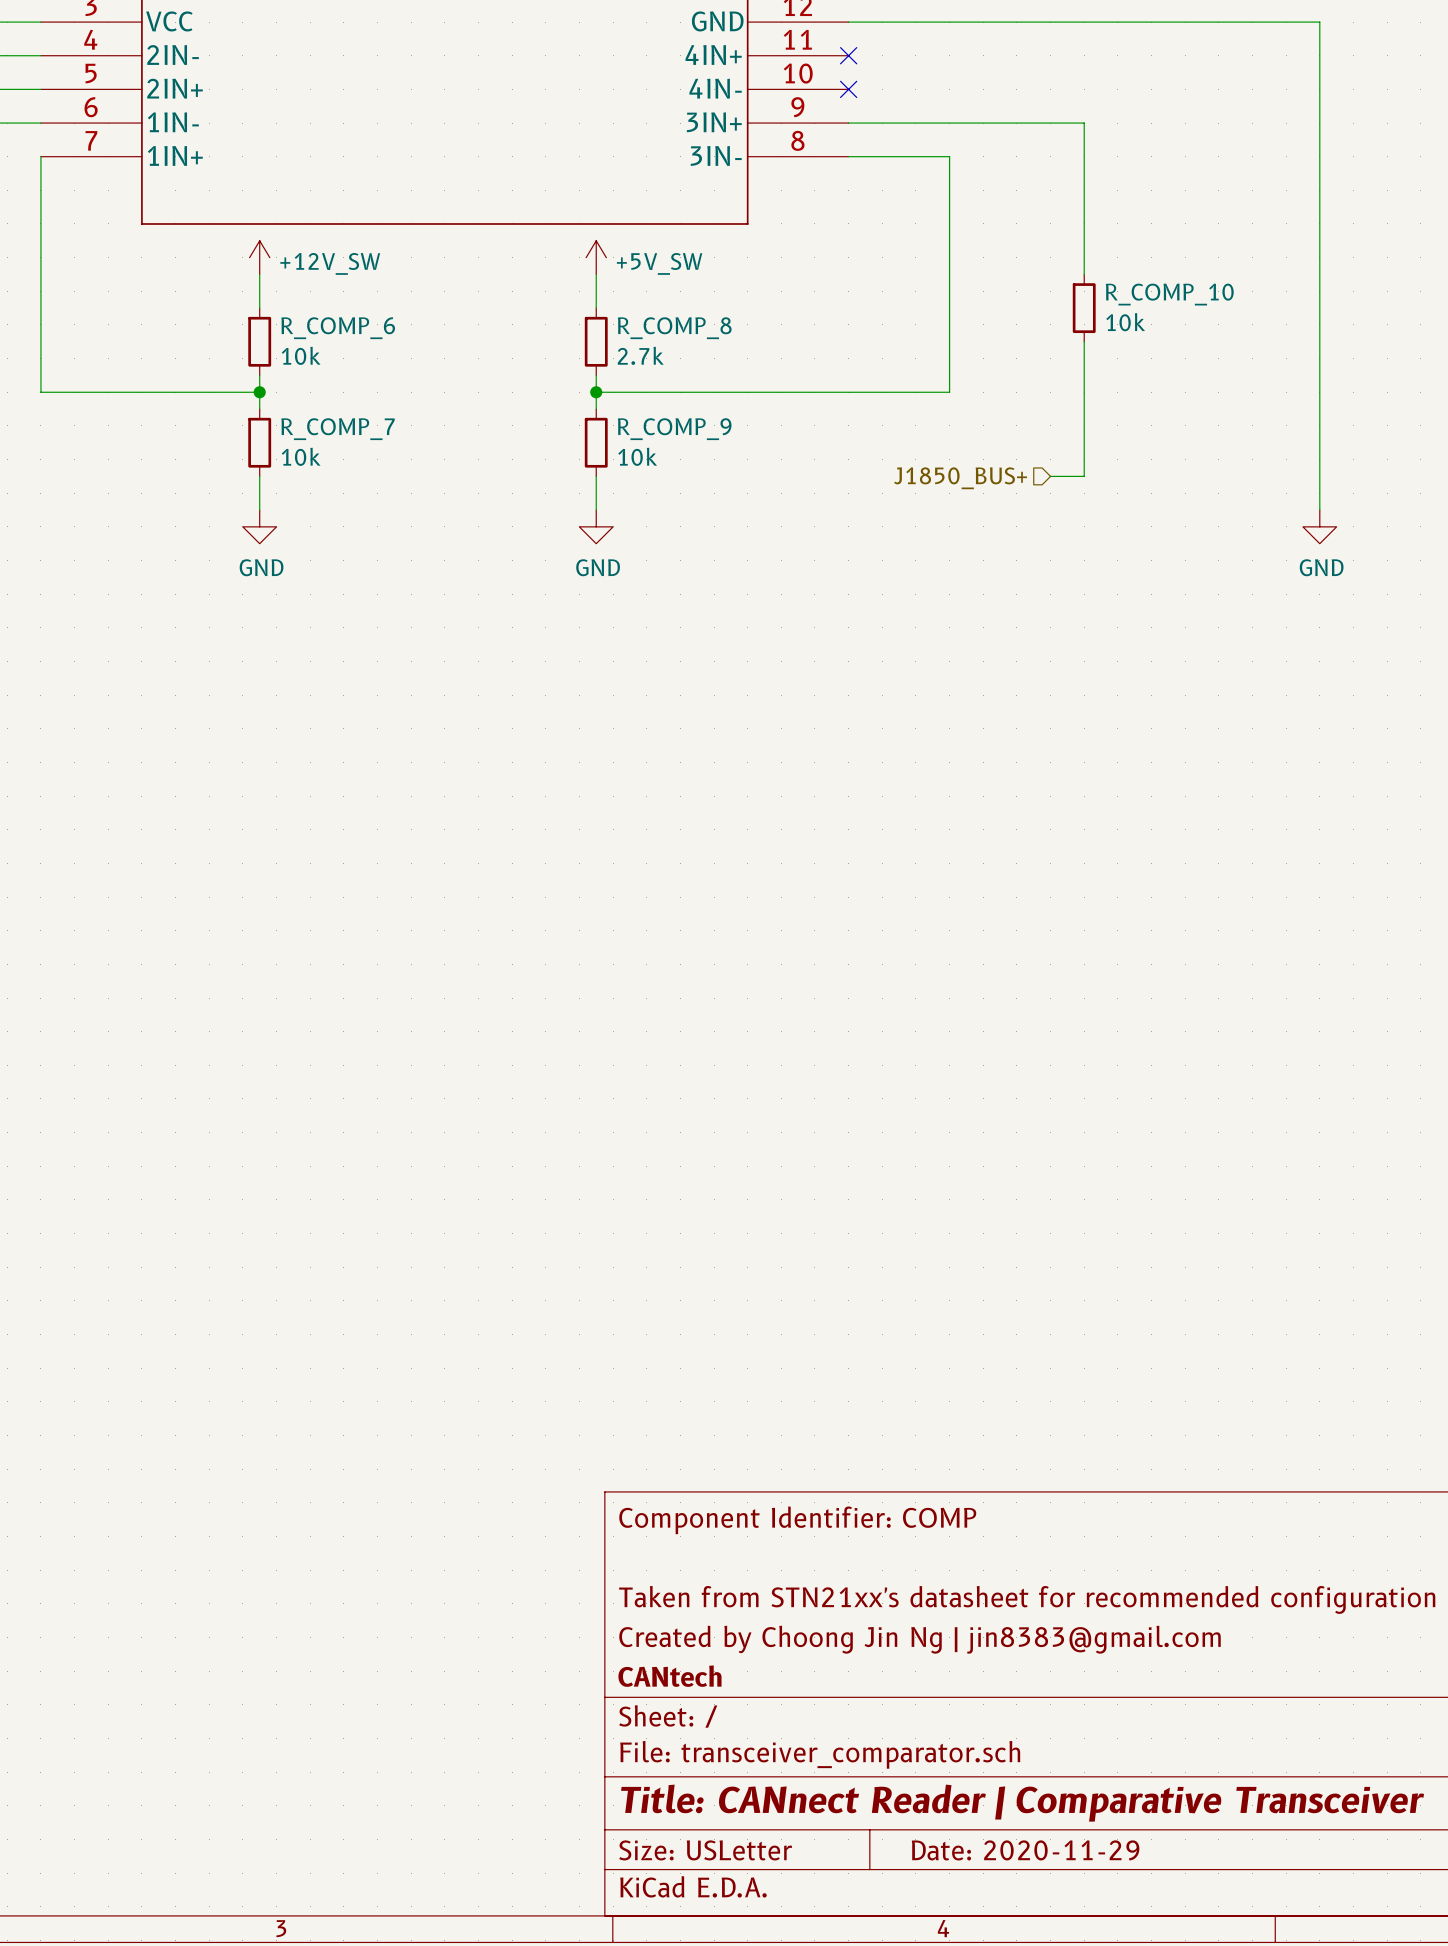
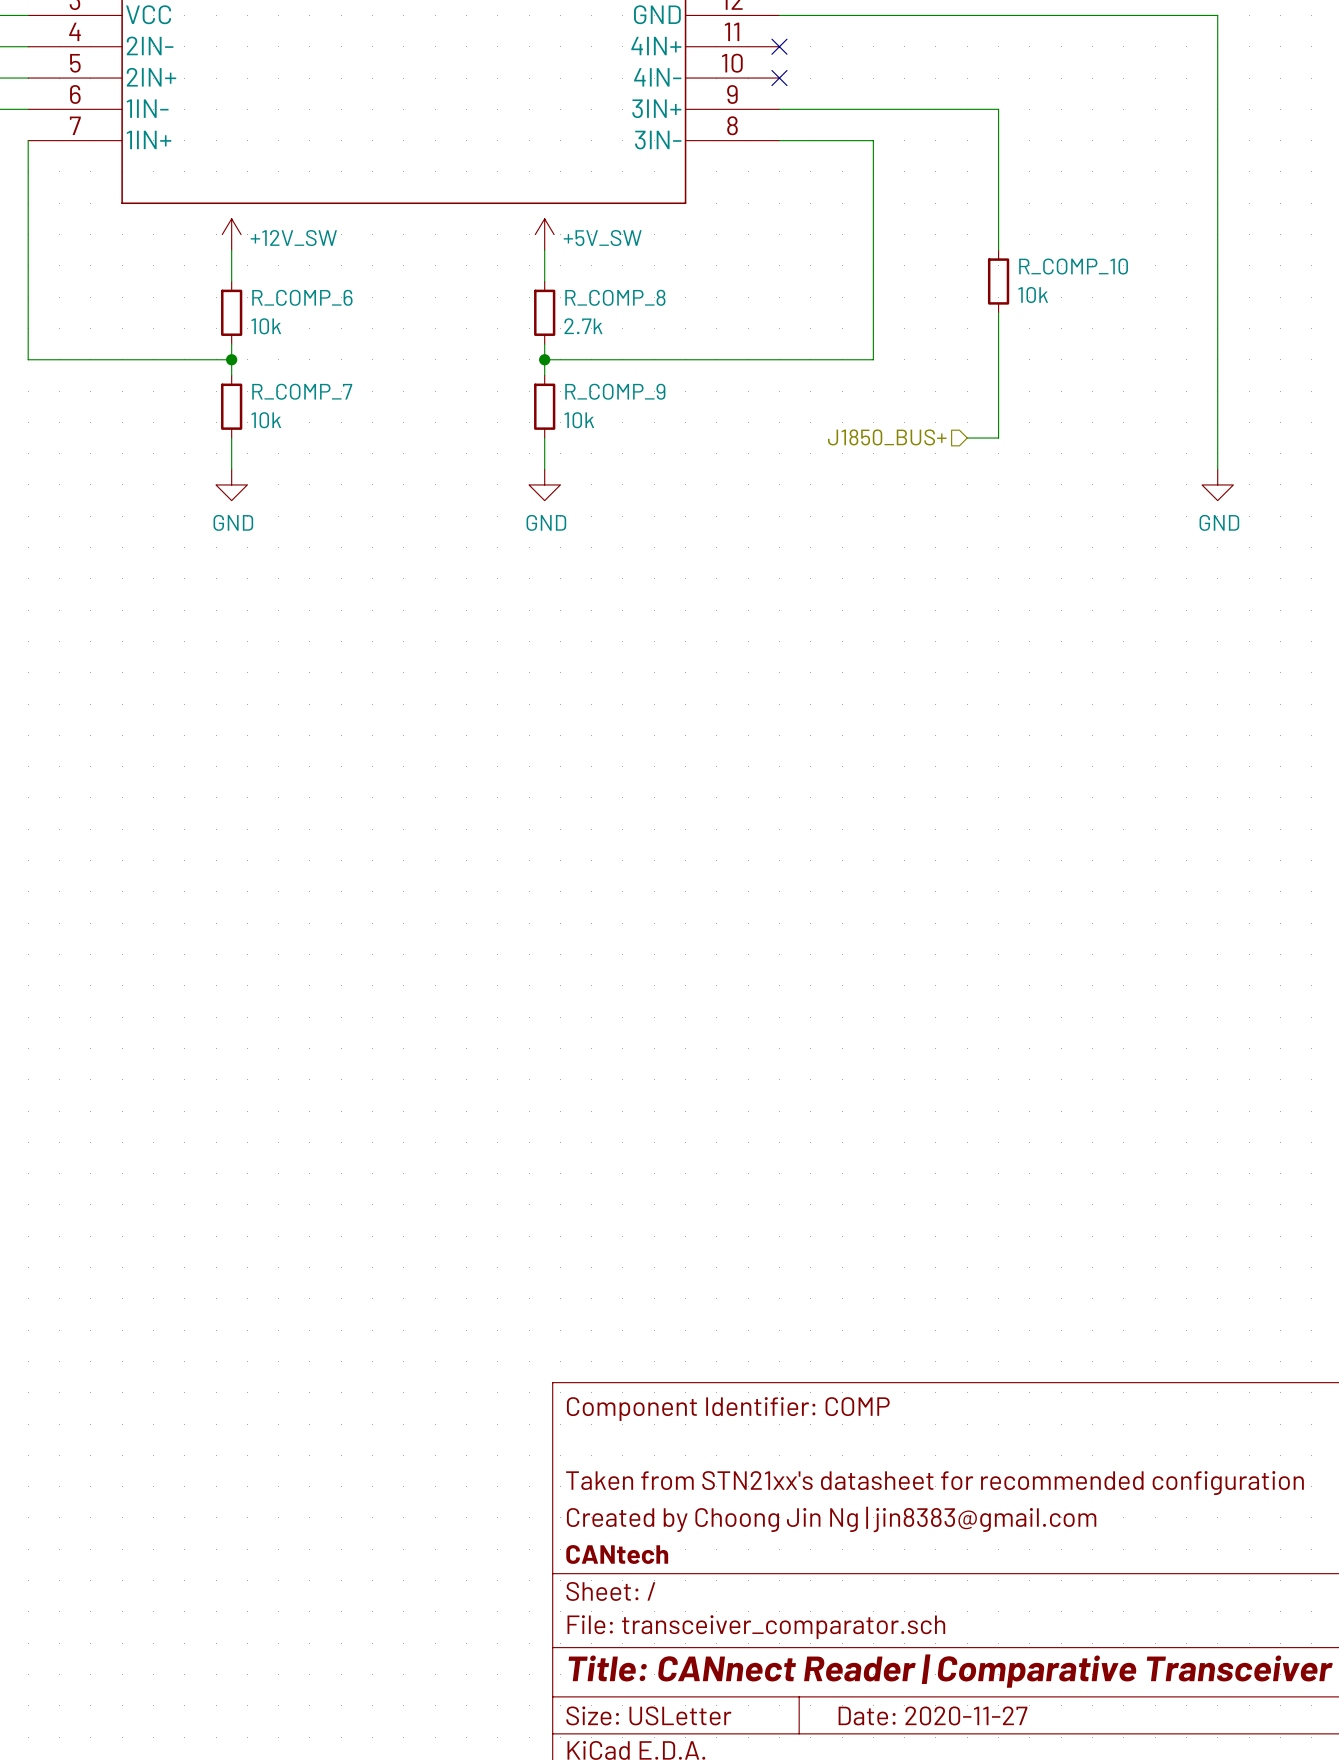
title block: Date: 2020-11-29 (1025, 1850) -> Date: 2020-11-27 (933, 1715)

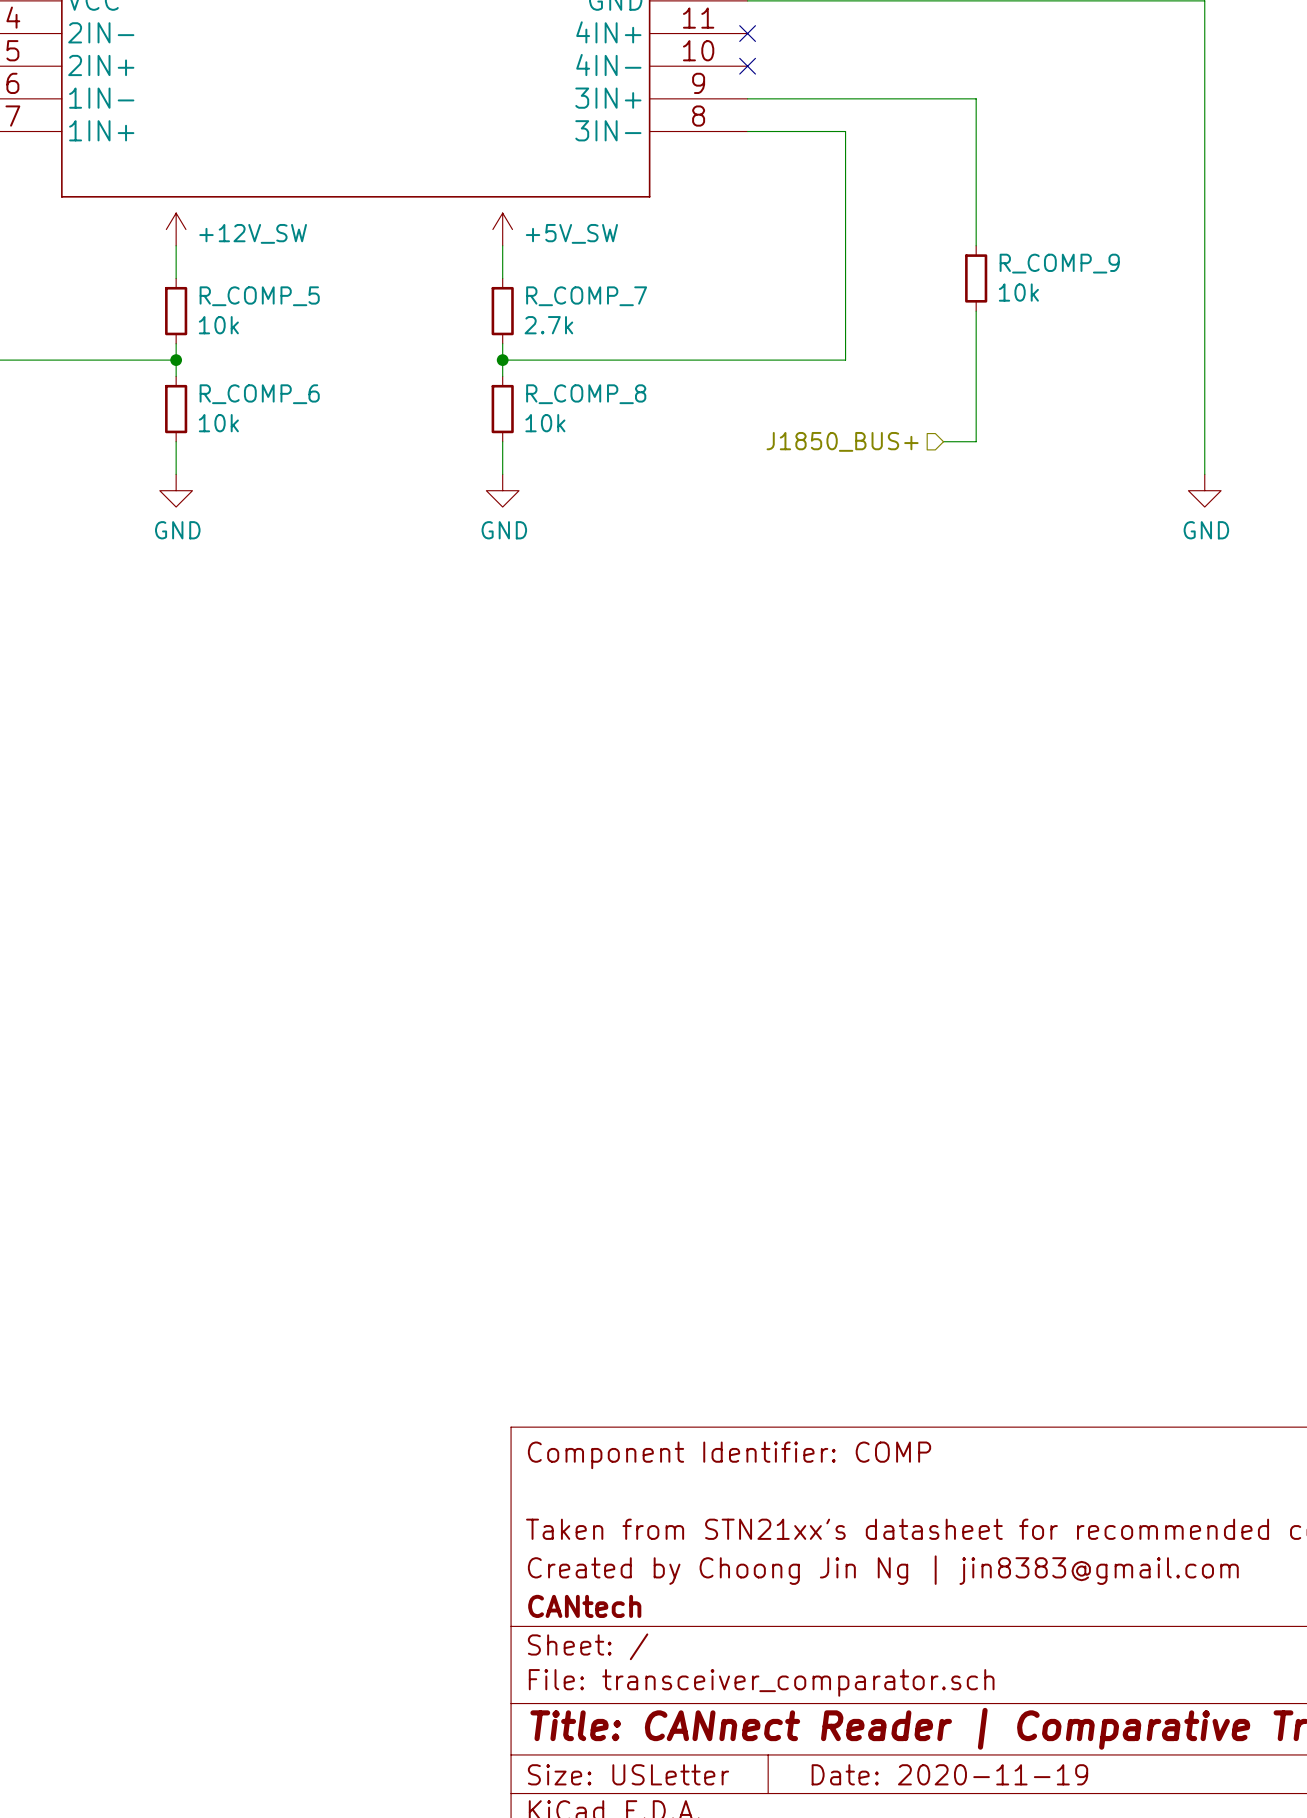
R_COMP_10 name: R_COMP_10 (1073, 266) -> R_COMP_9 (1059, 263)
R_COMP_6 name: R_COMP_6 (302, 297) -> R_COMP_5 (259, 296)
R_COMP_8 name: R_COMP_8 (615, 297) -> R_COMP_7 (586, 296)
R_COMP_7 name: R_COMP_7 (302, 391) -> R_COMP_6 (259, 394)
R_COMP_9 name: R_COMP_9 (615, 391) -> R_COMP_8 (586, 394)
title block: Date: 2020-11-27 (933, 1715) -> Date: 2020-11-19 (949, 1774)

